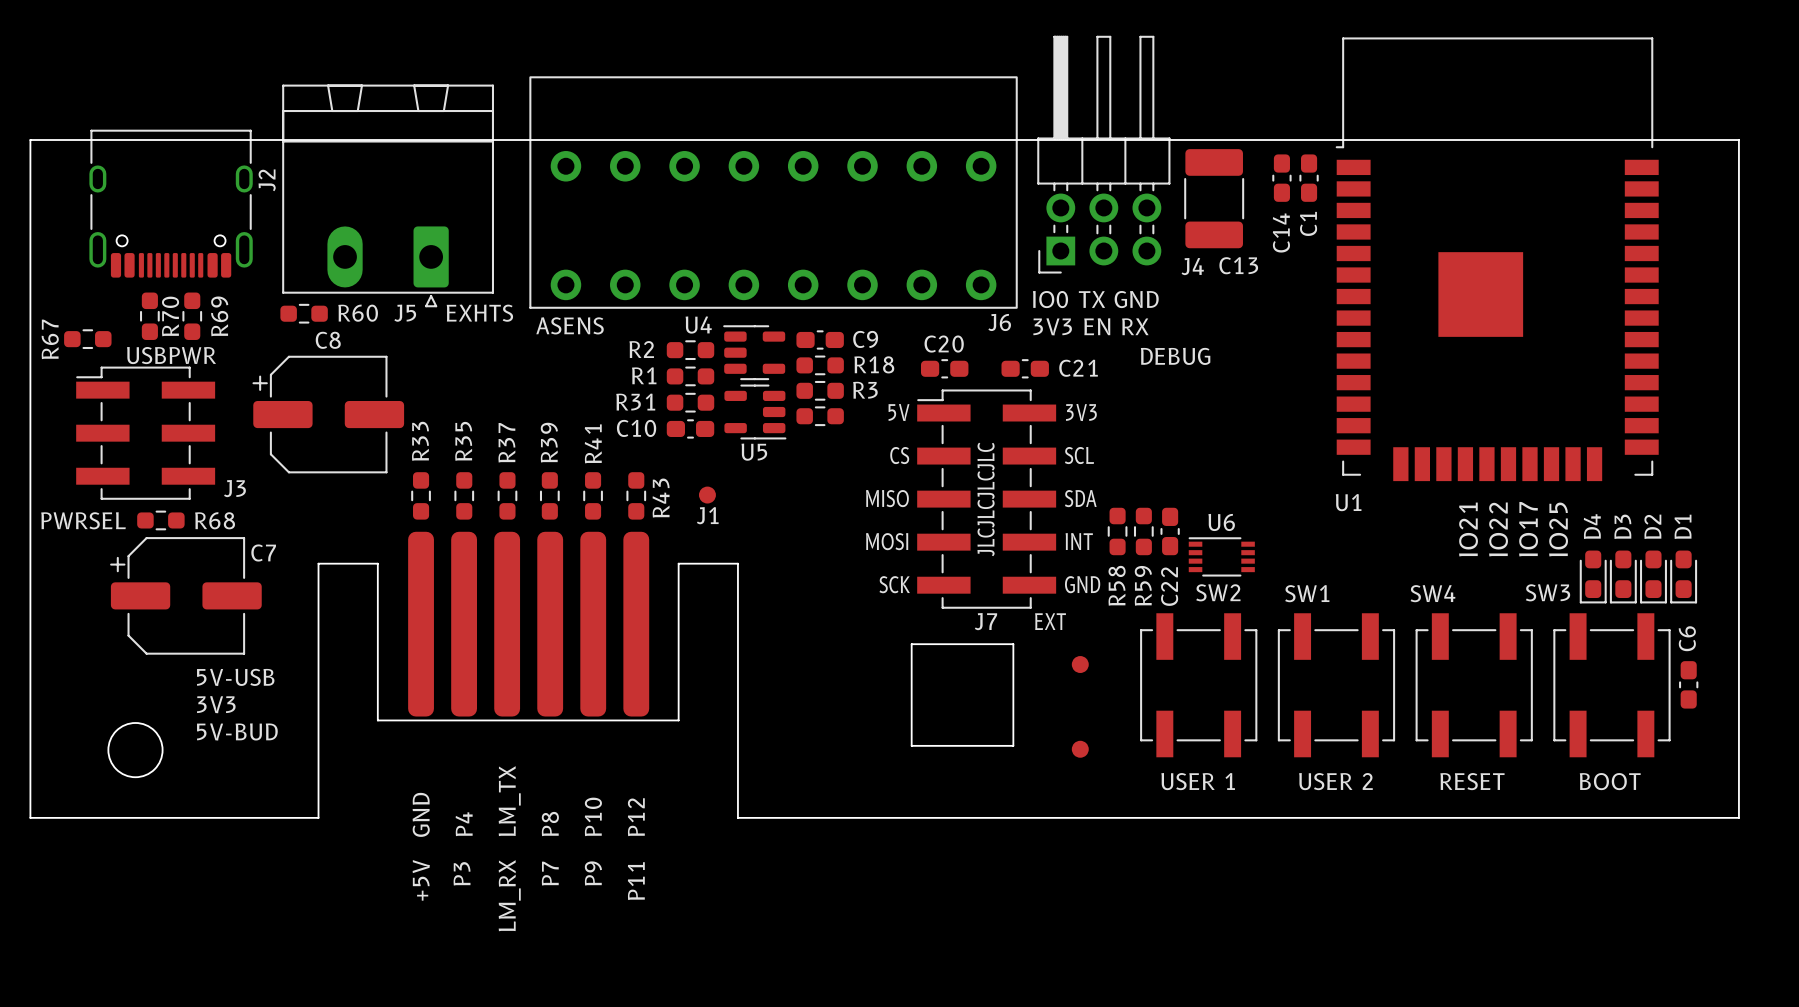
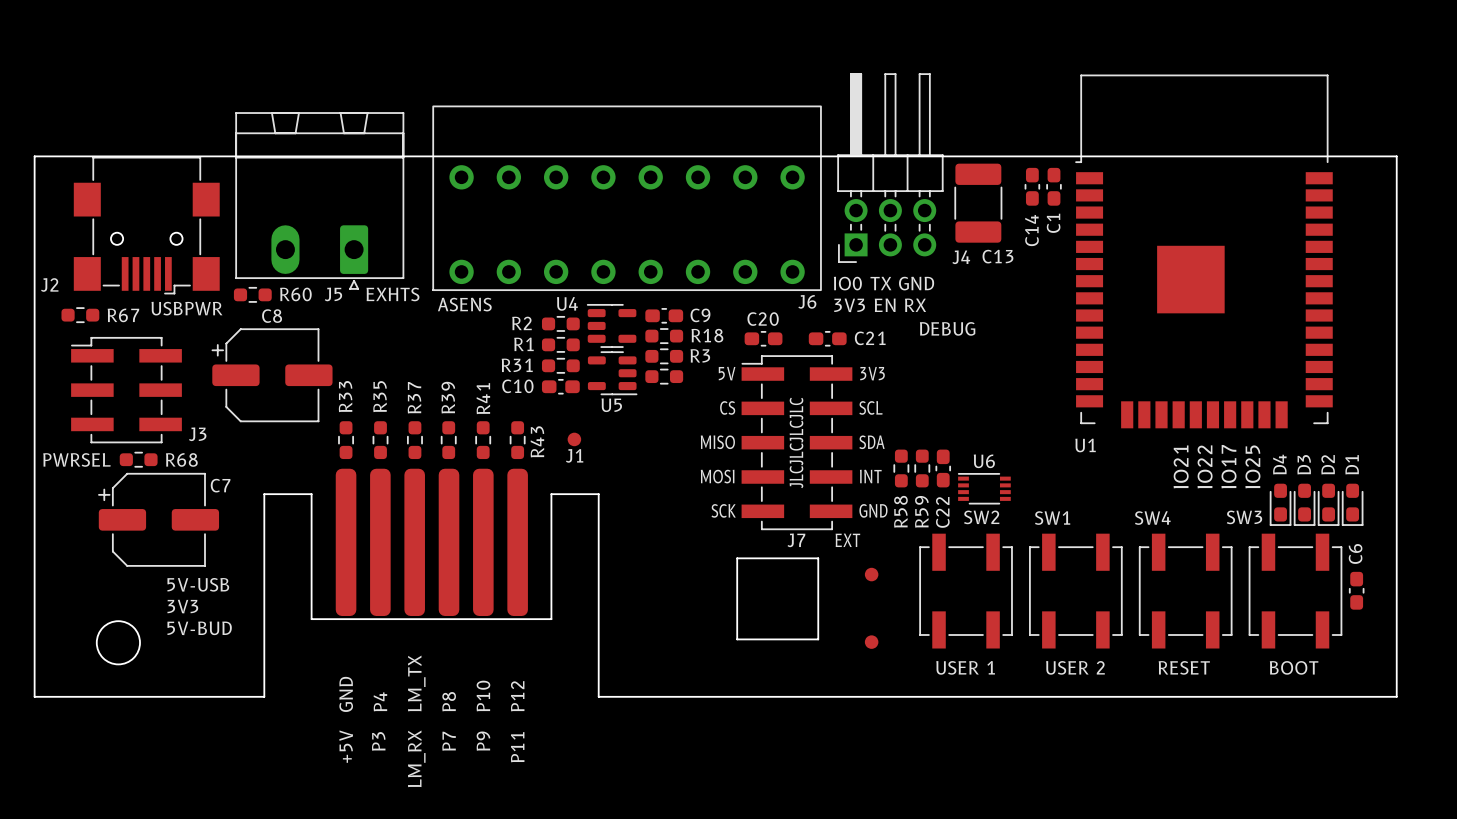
J2 footprint: [89, 129, 253, 278] -> [73, 156, 220, 295]
J2 name position: J2 (267, 180) -> J2 (49, 284)
R70: (149, 316) -> none
R69: (192, 316) -> none
R67 name rotation: 0° (50, 339) -> 90° clockwise (123, 315)
R67 name position: R67 (50, 339) -> R67 (123, 315)
text position: USBPWR (171, 355) -> USBPWR (186, 308)

